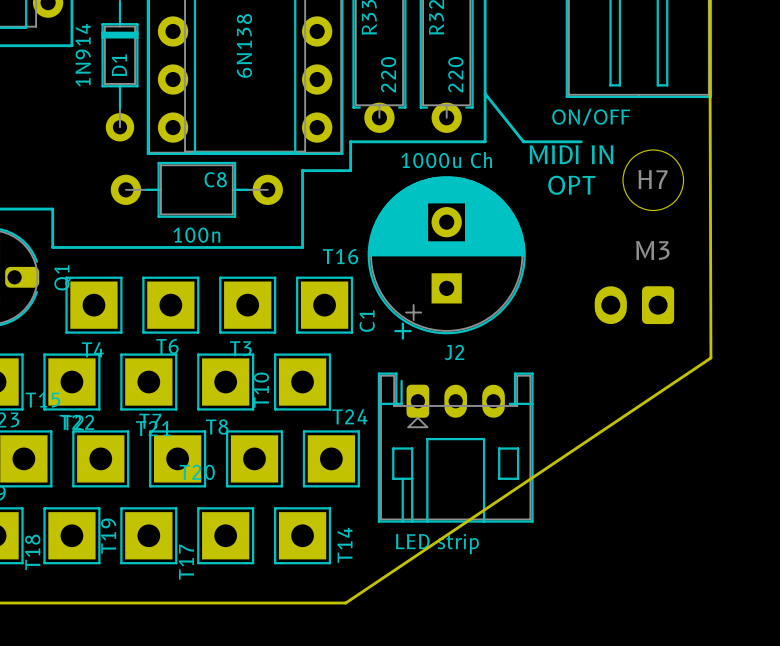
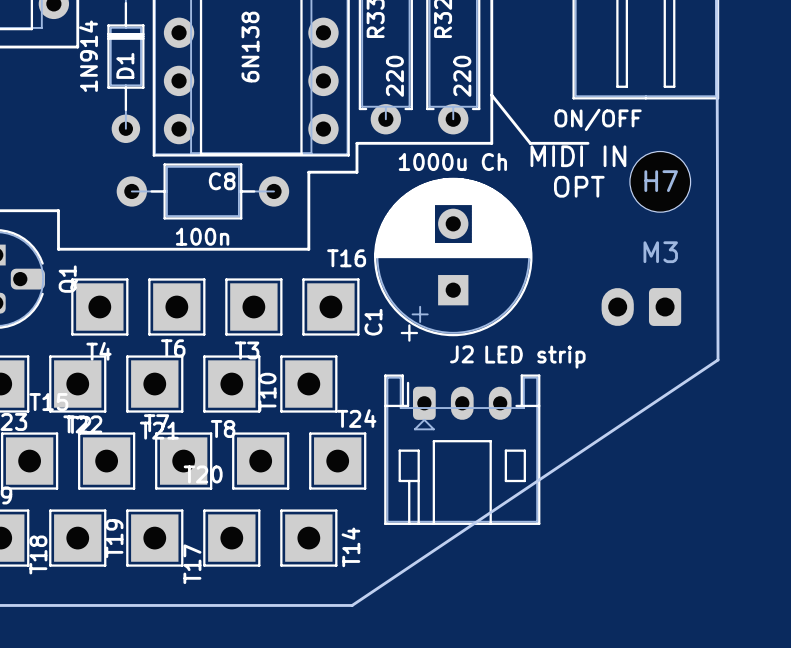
J2 value position: LED strip (437, 544) -> LED strip (535, 357)

